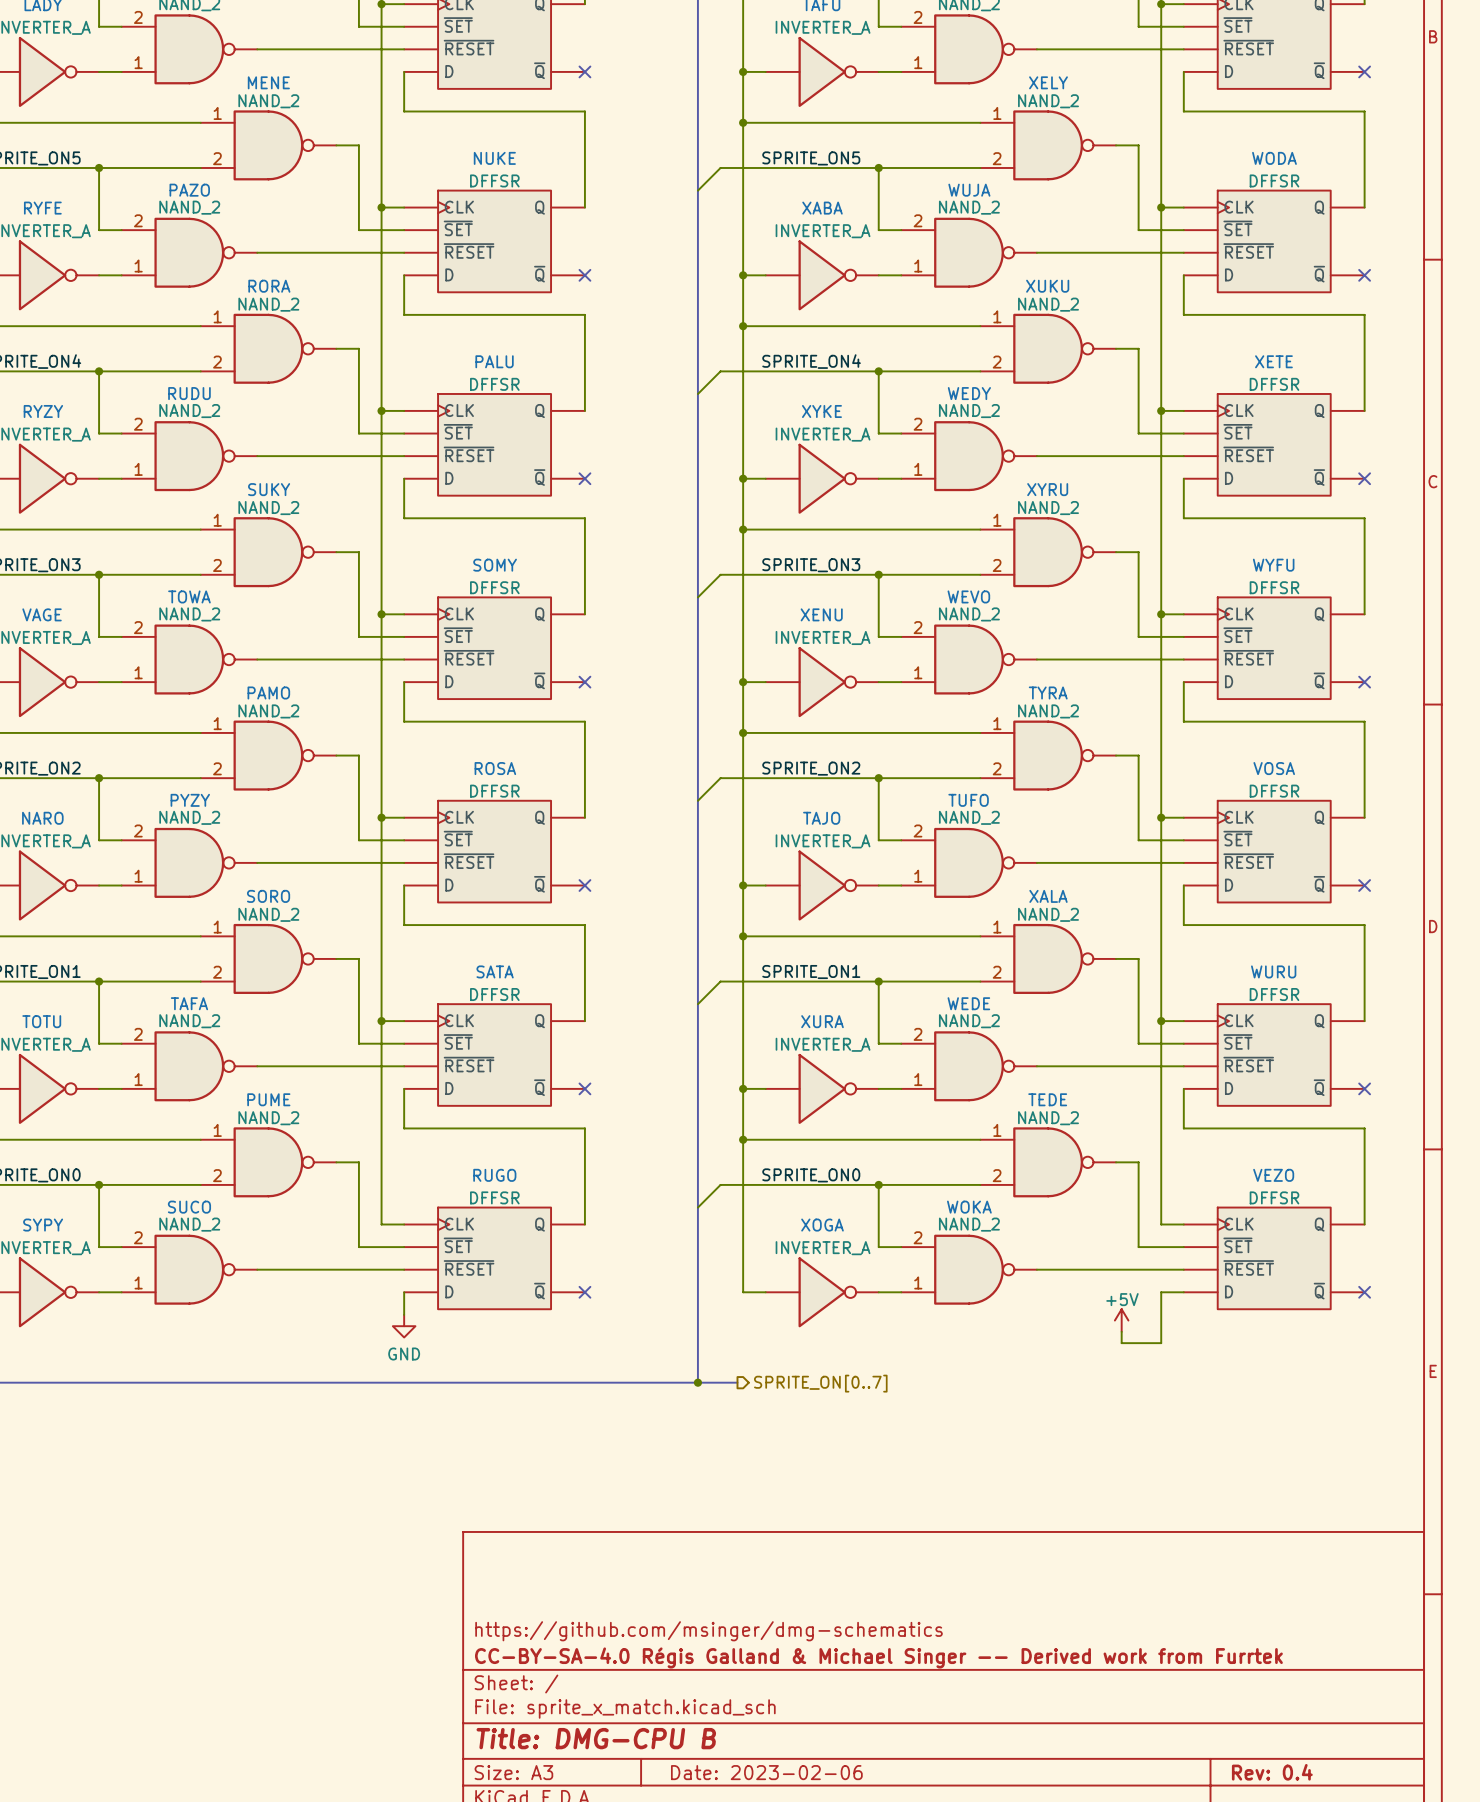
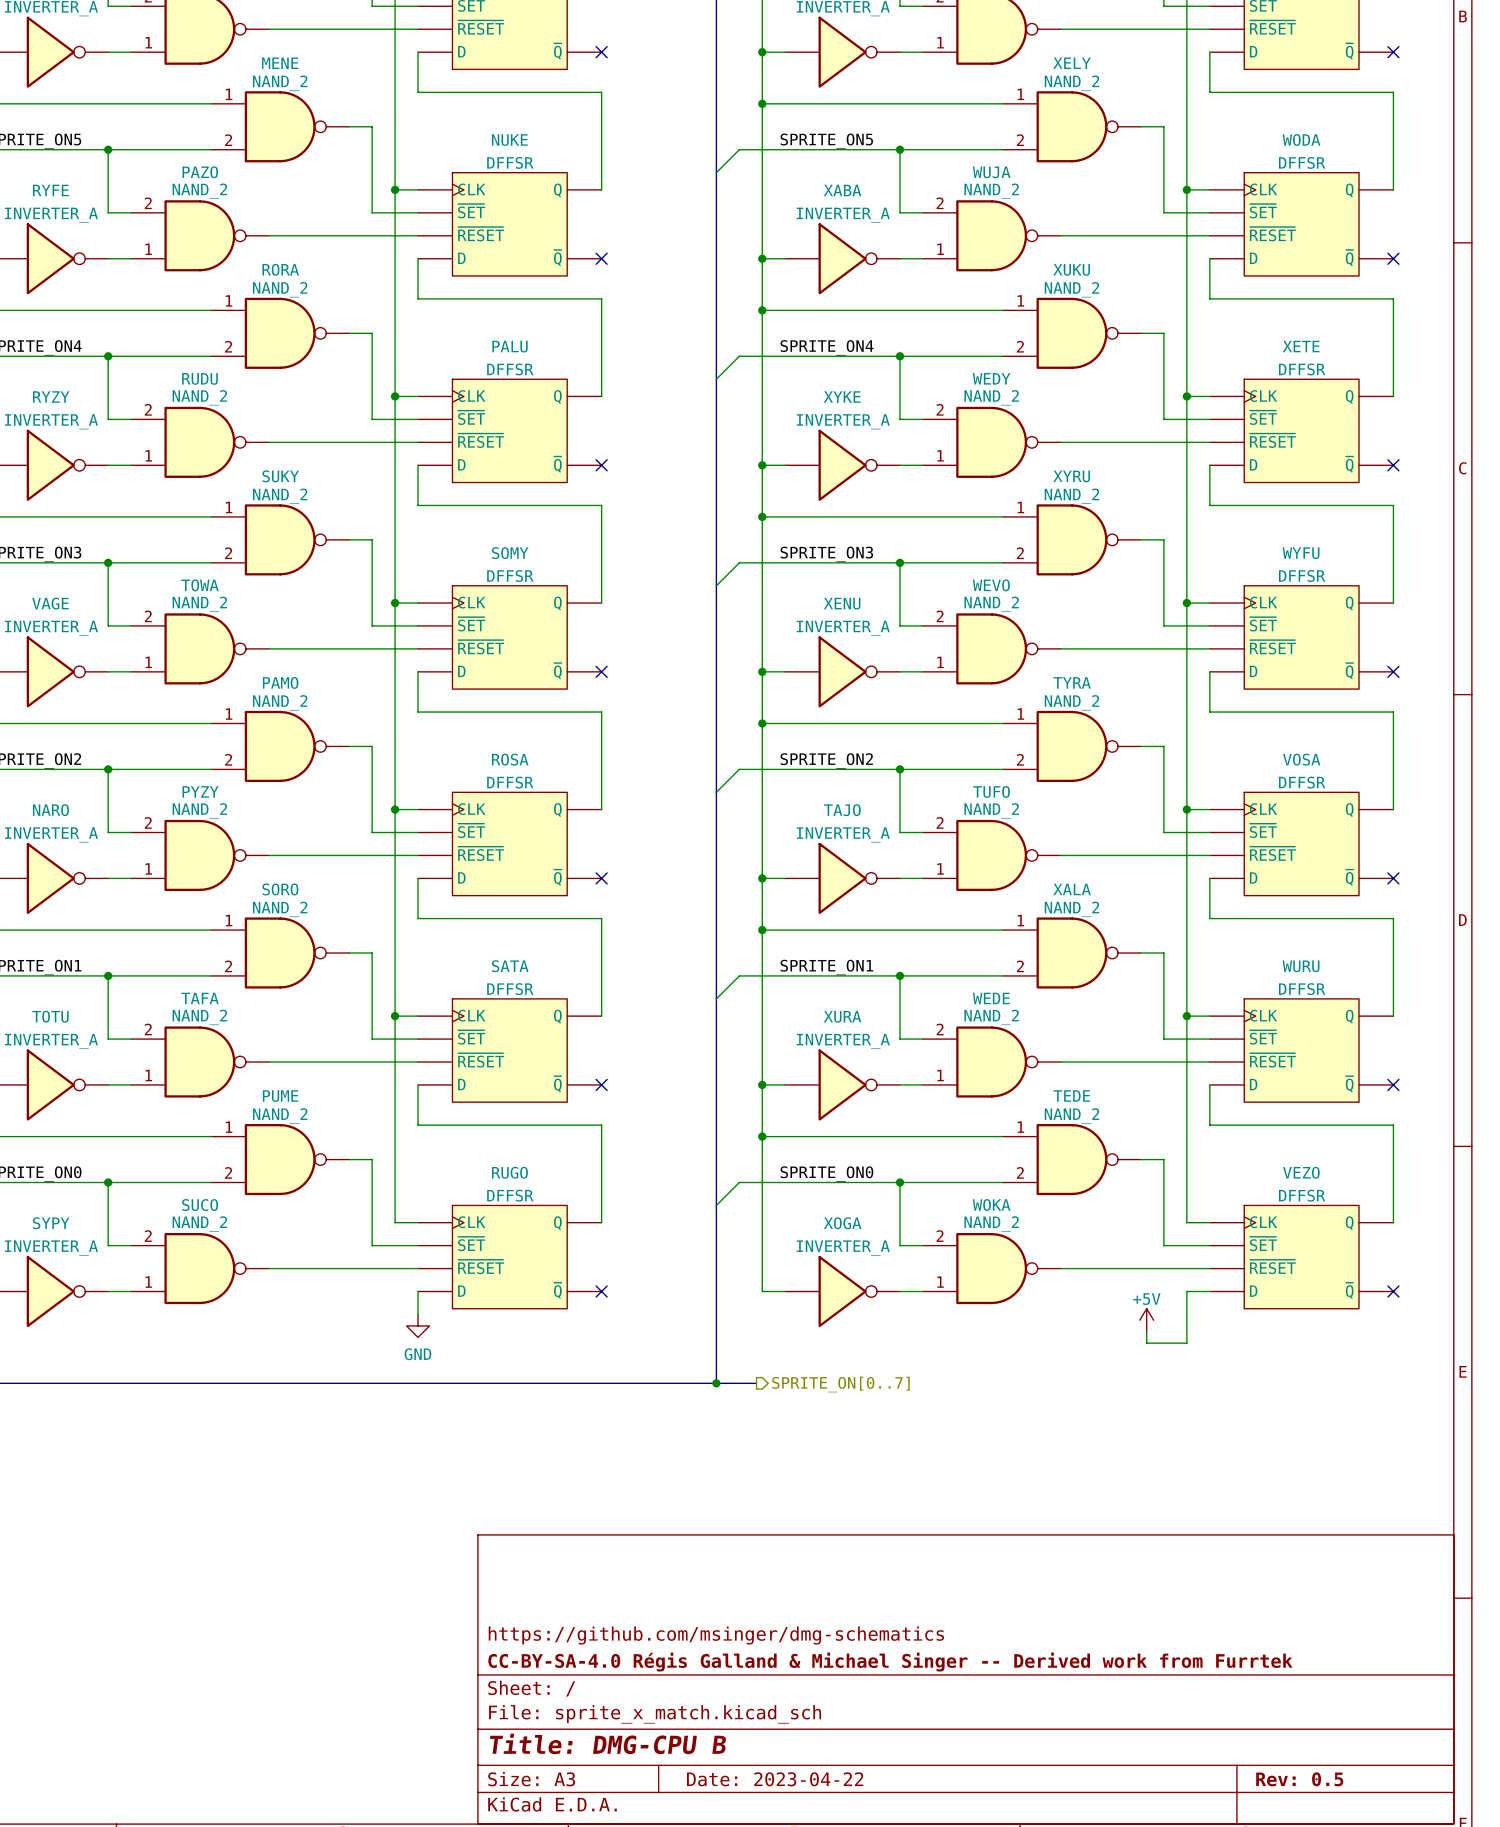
title block: Date: 2023-02-06 (766, 1772) -> Date: 2023-04-22 (775, 1779)
title block: Rev: 0.4 (1272, 1772) -> Rev: 0.5 (1299, 1779)

